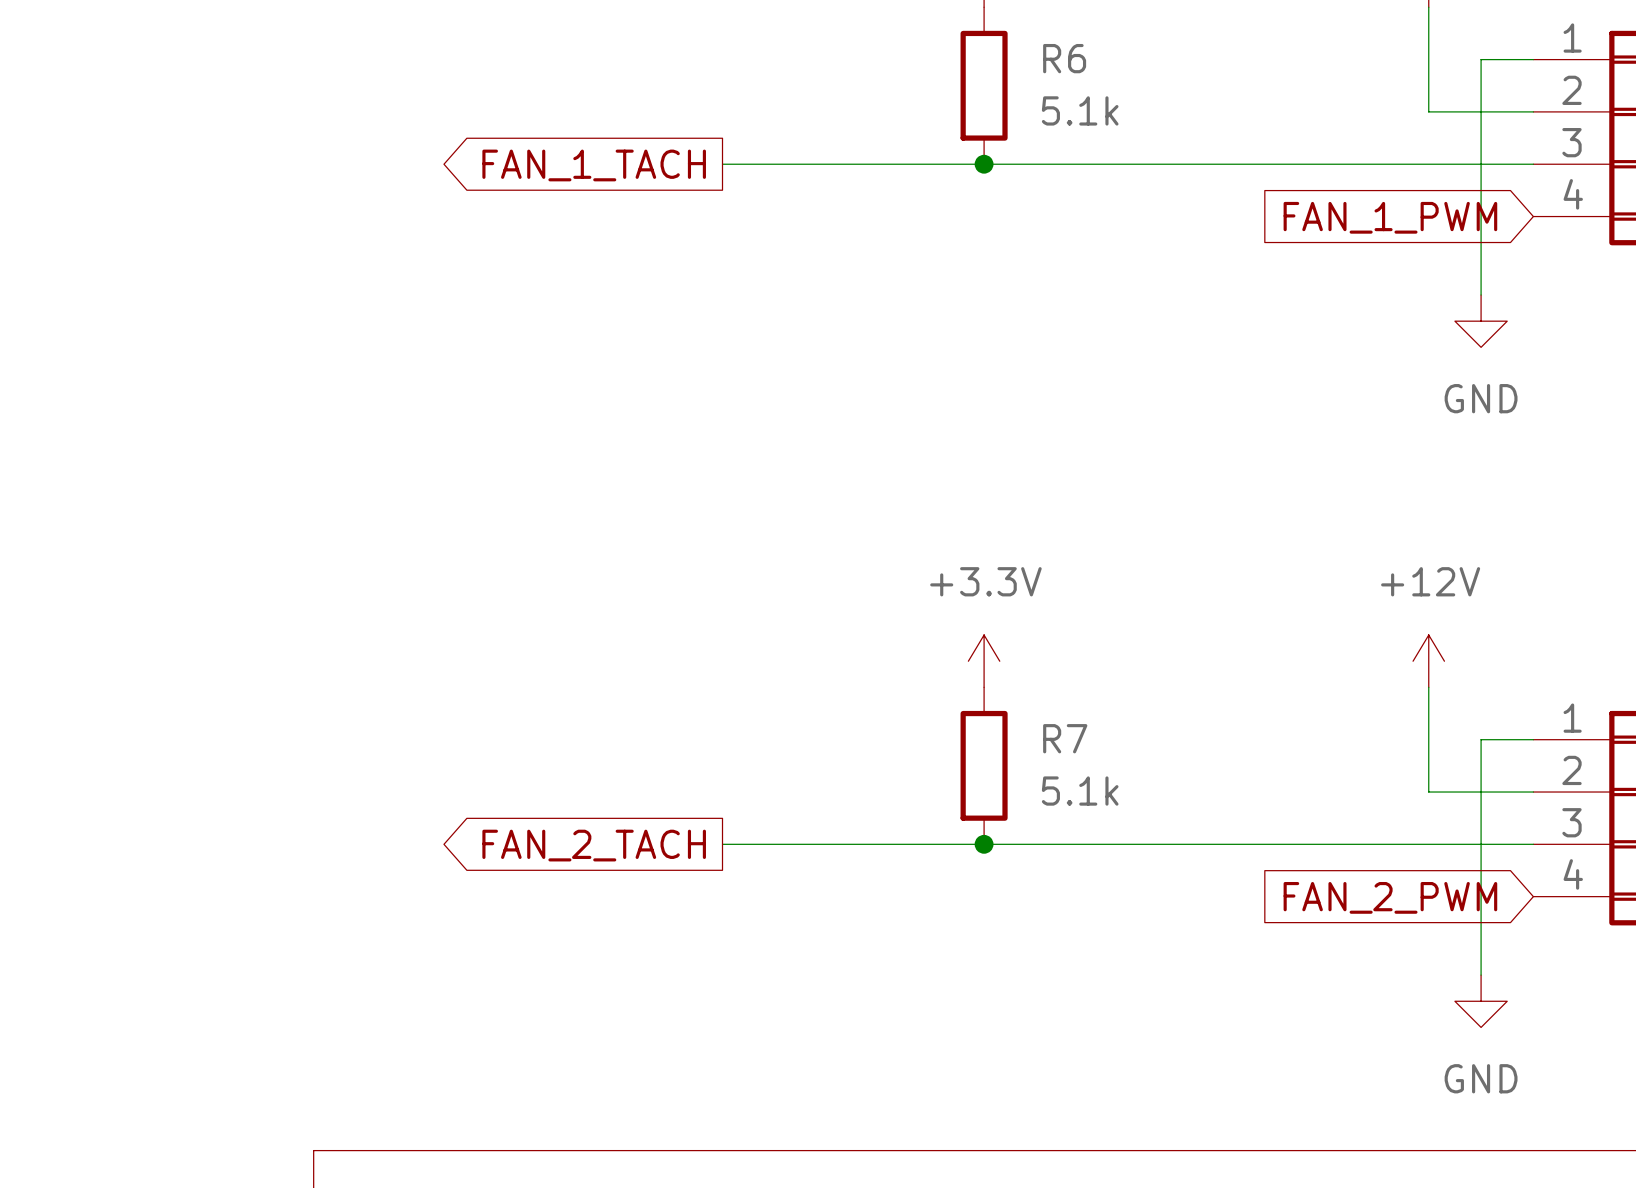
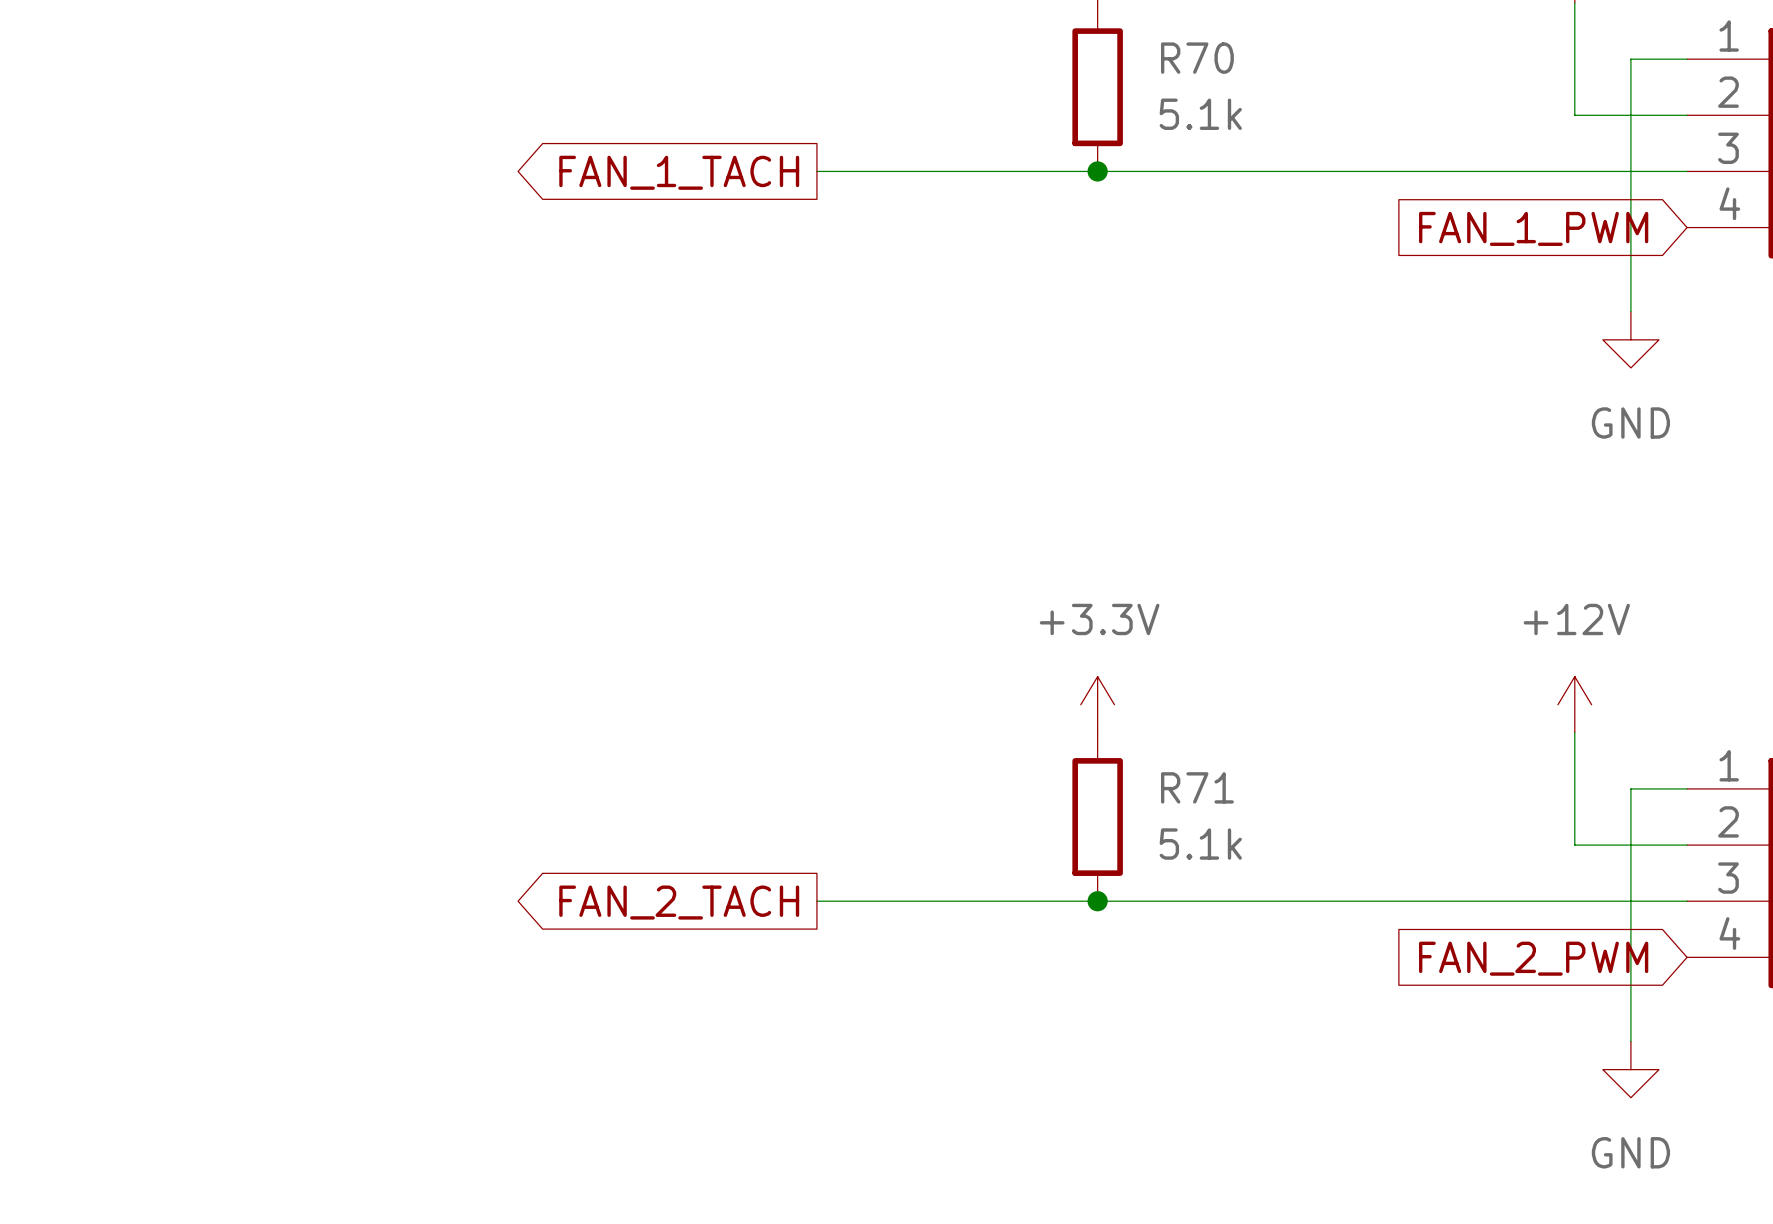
R6 name: R6 (1064, 58) -> R70 (1197, 58)
R7 name: R7 (1065, 738) -> R71 (1197, 787)

